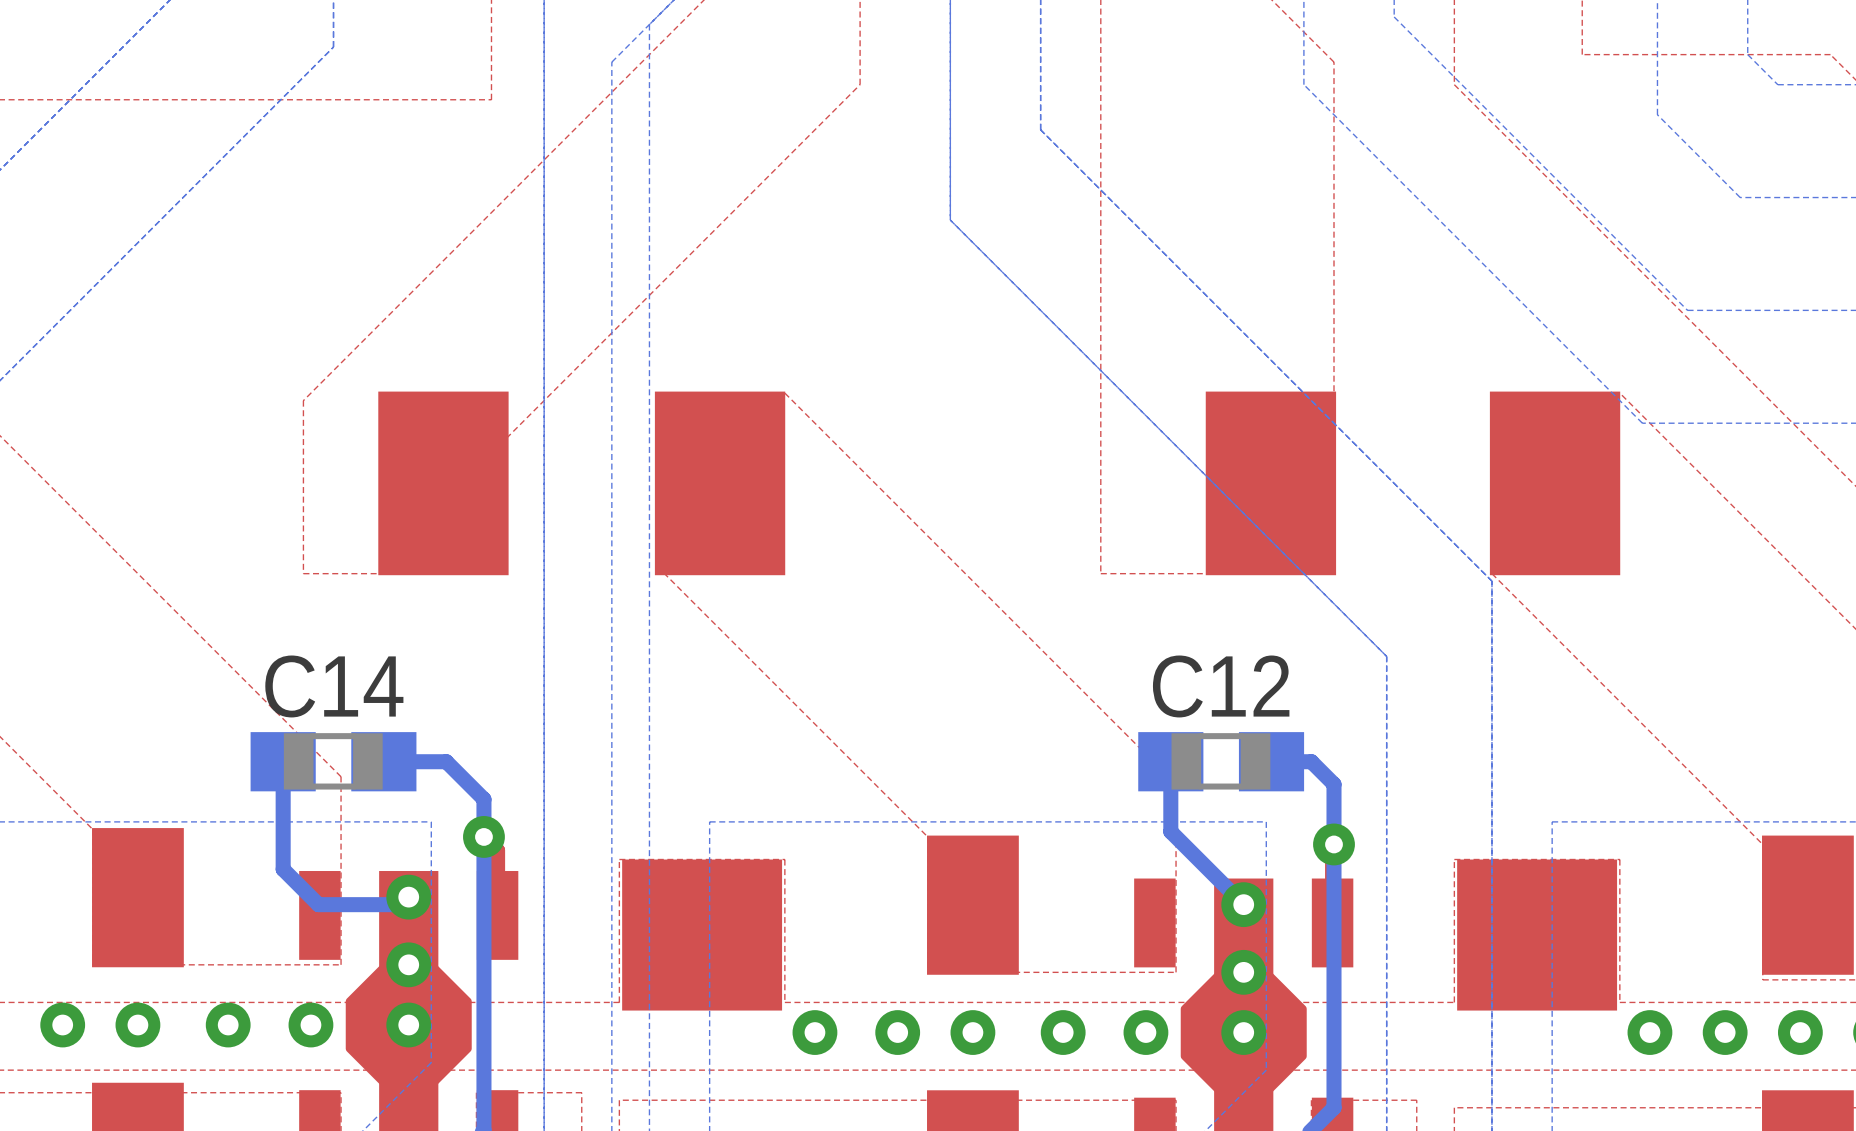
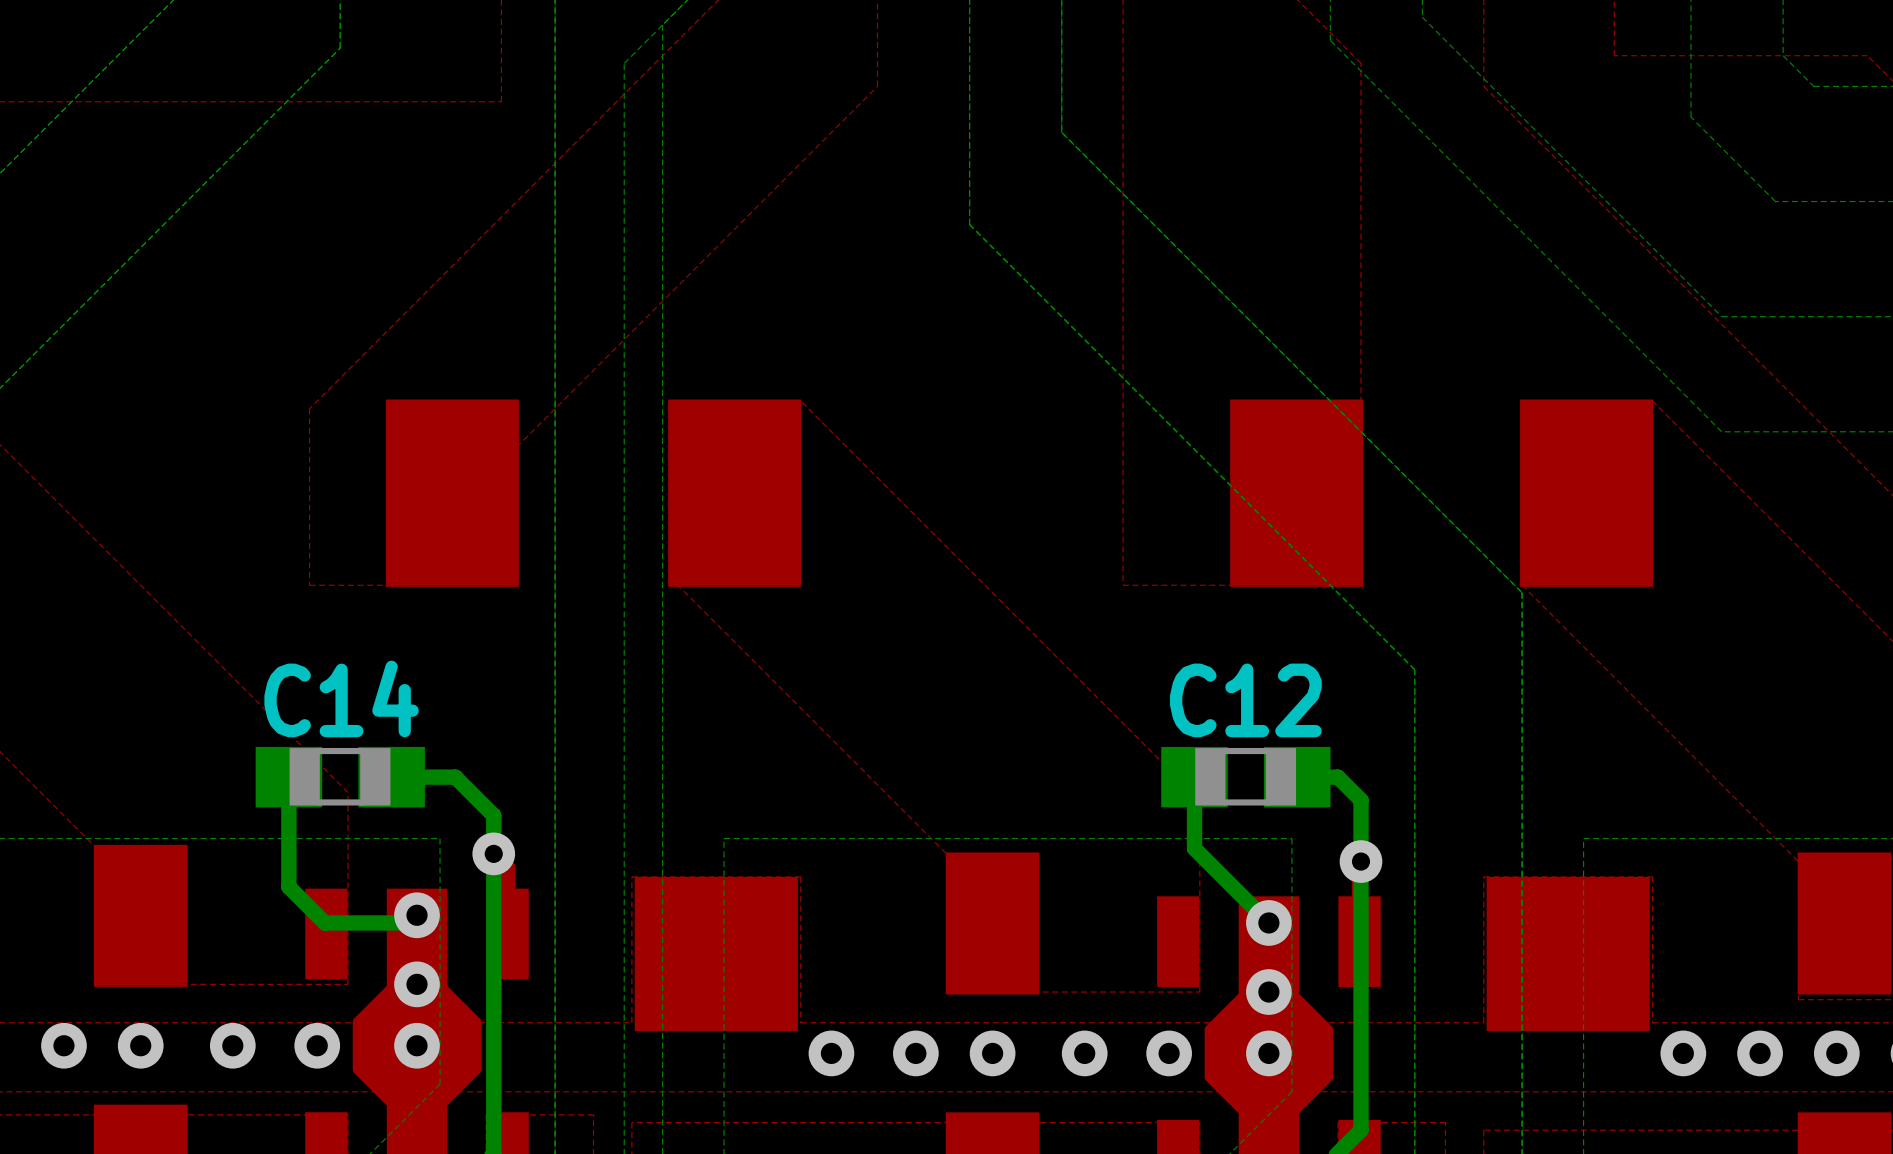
bottom zone outline: (1303, 39) (1303, 84) (1642, 423) (1687, 423) -> (1330, 40) (1721, 431)

